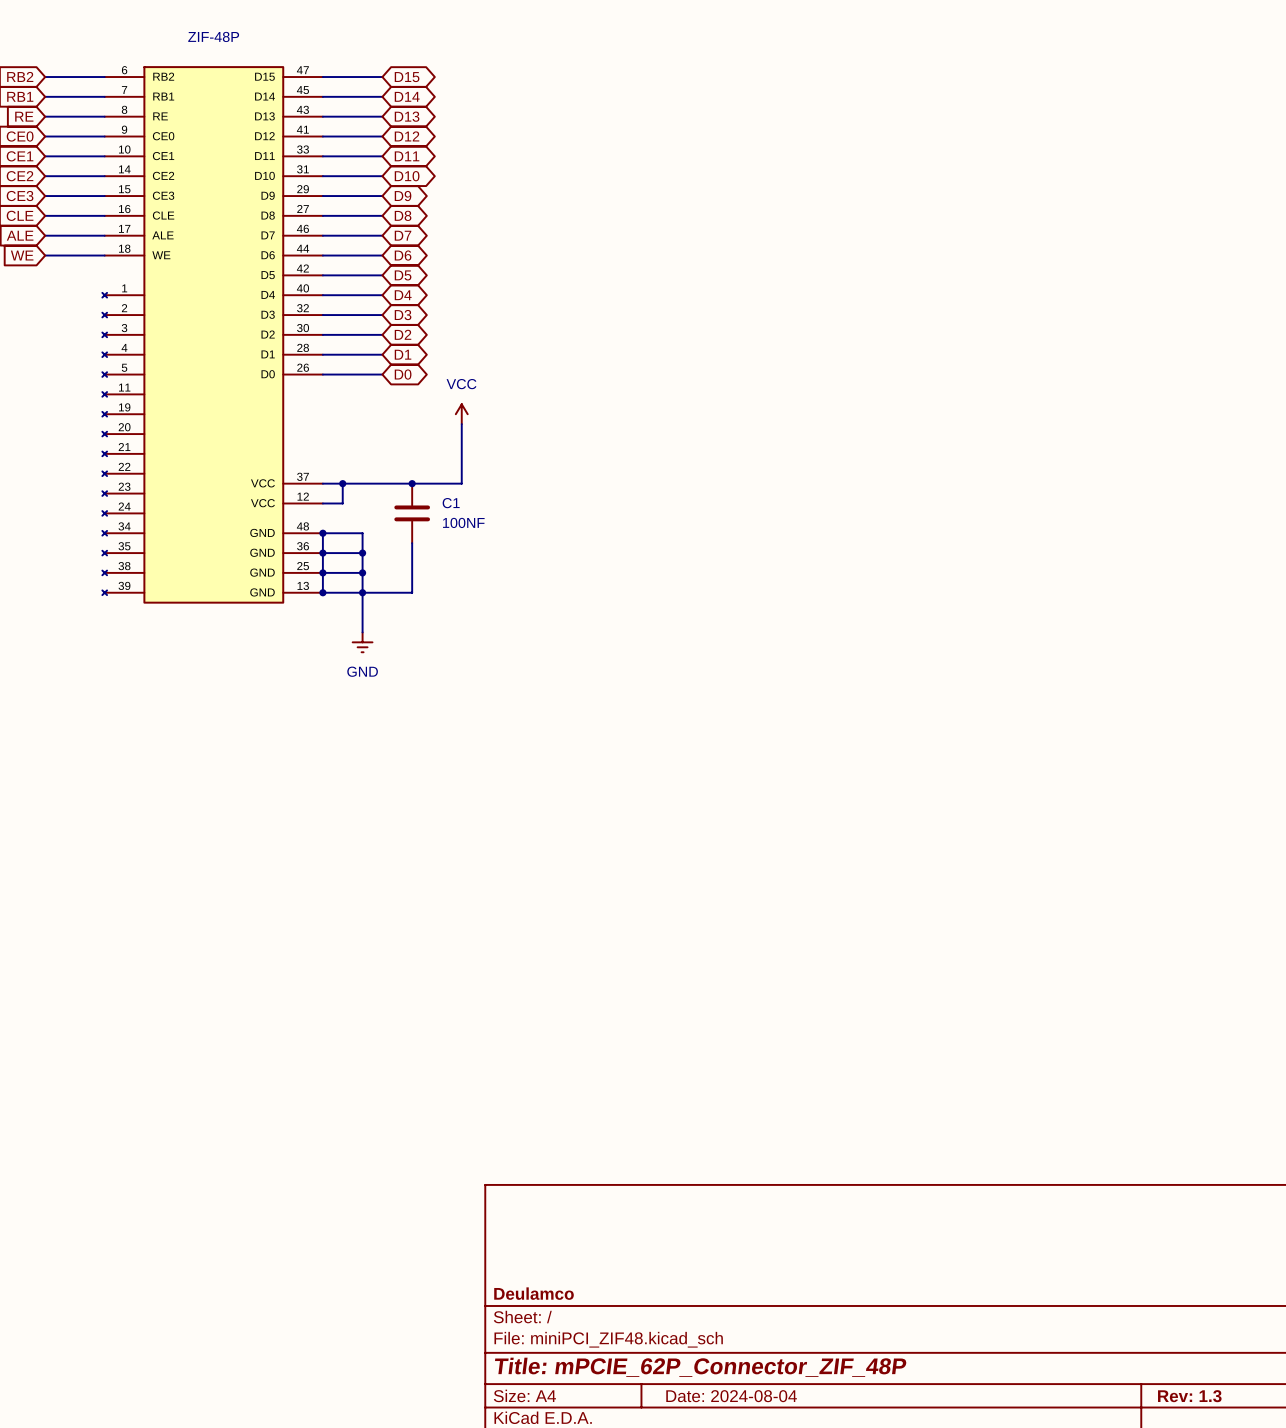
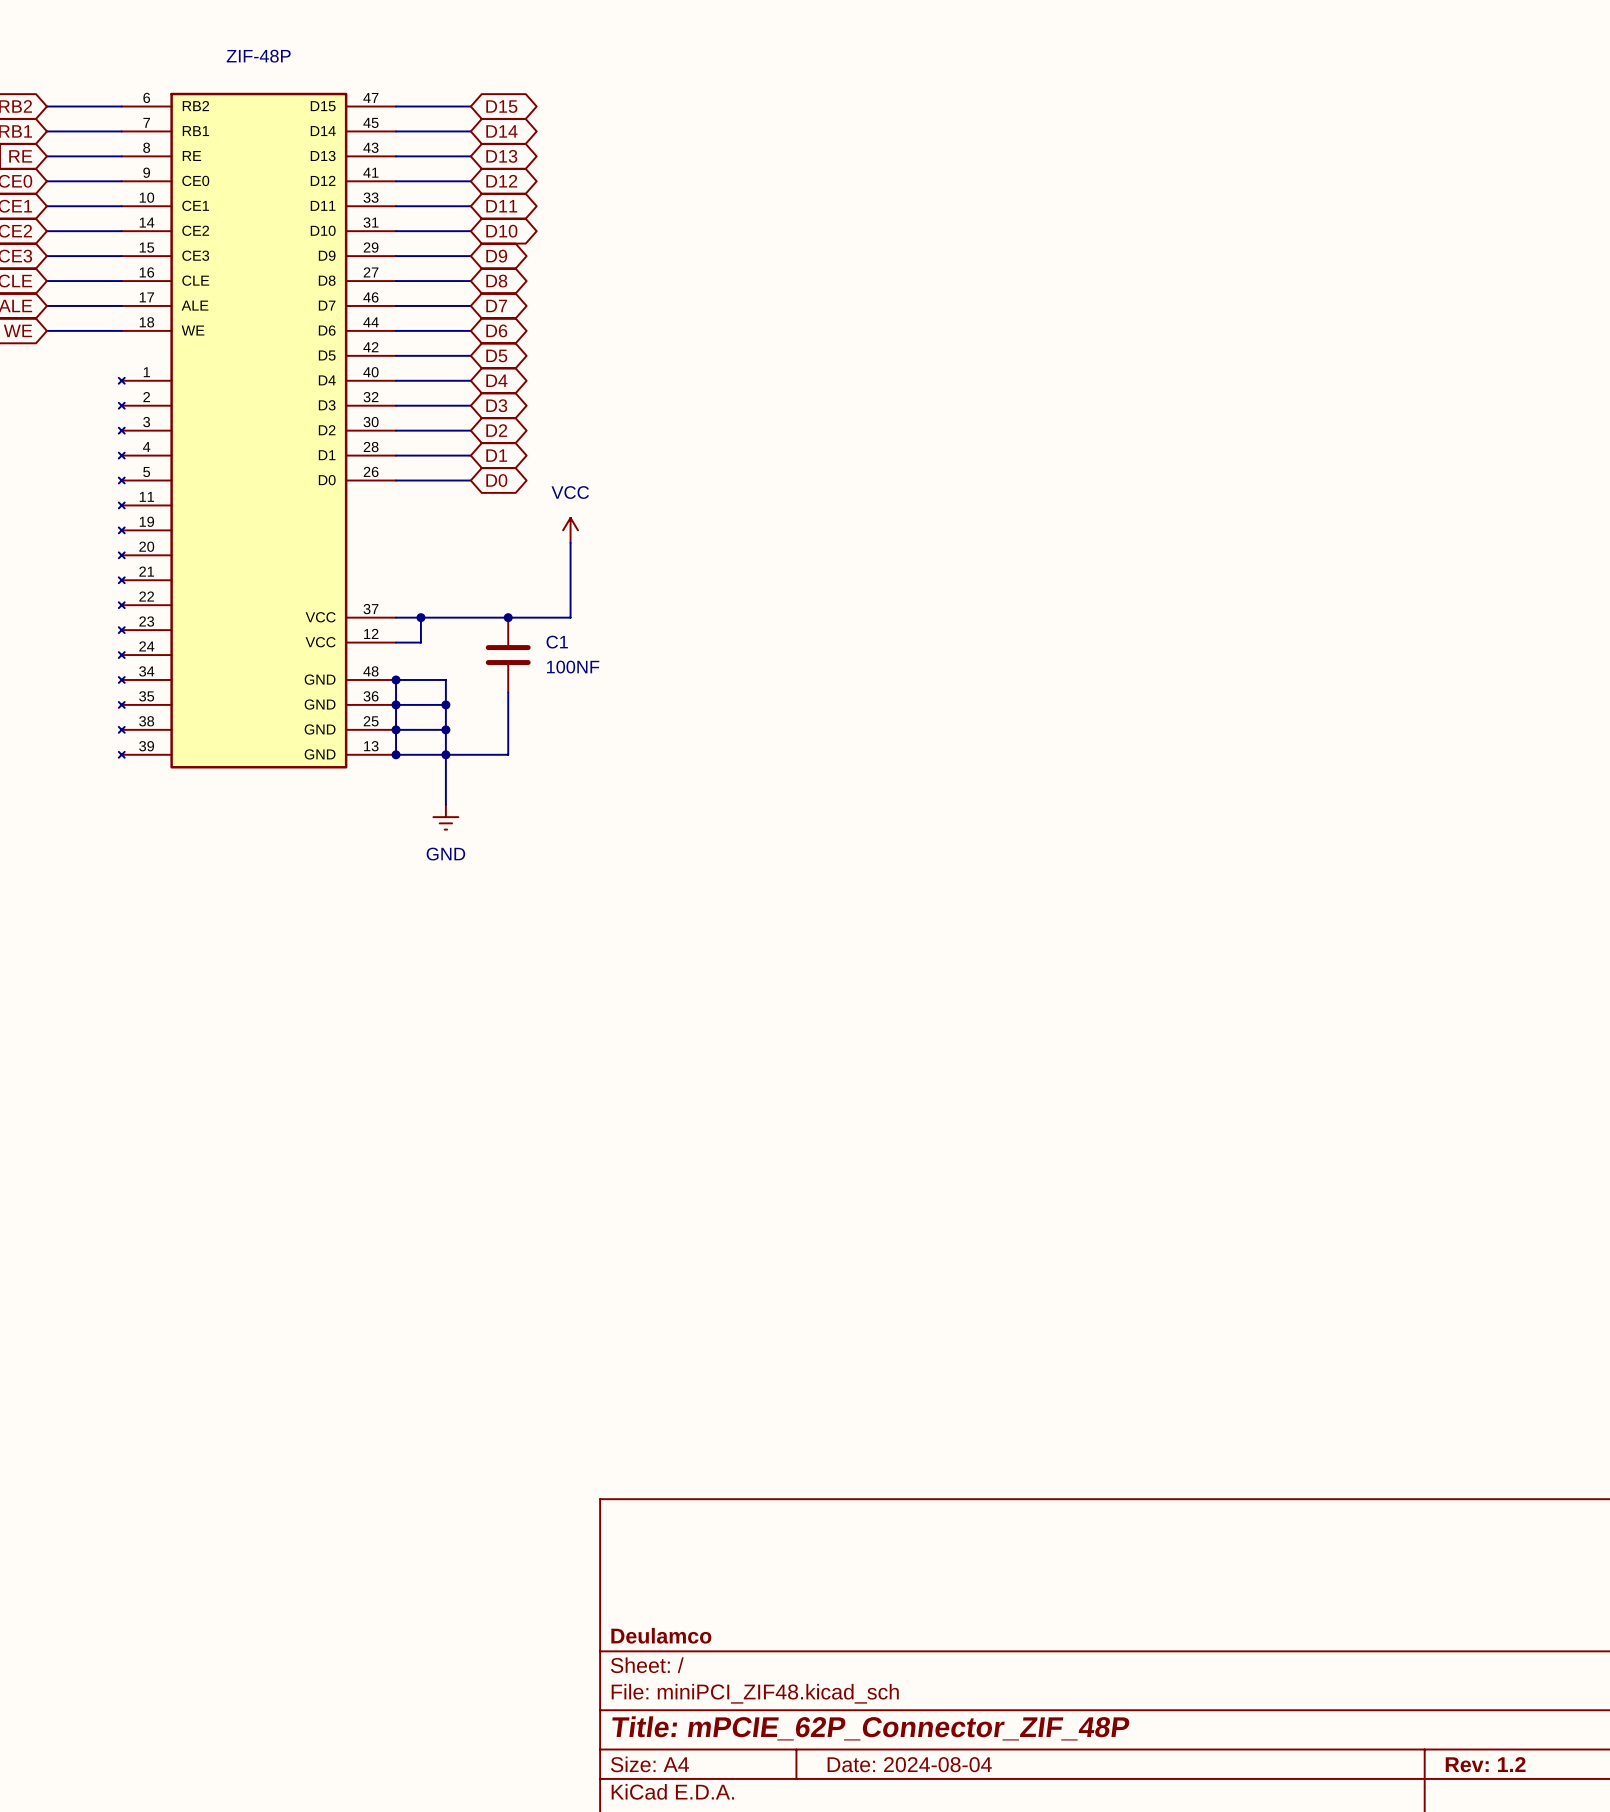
title block: Rev: 1.3 (1189, 1396) -> Rev: 1.2 (1485, 1764)

